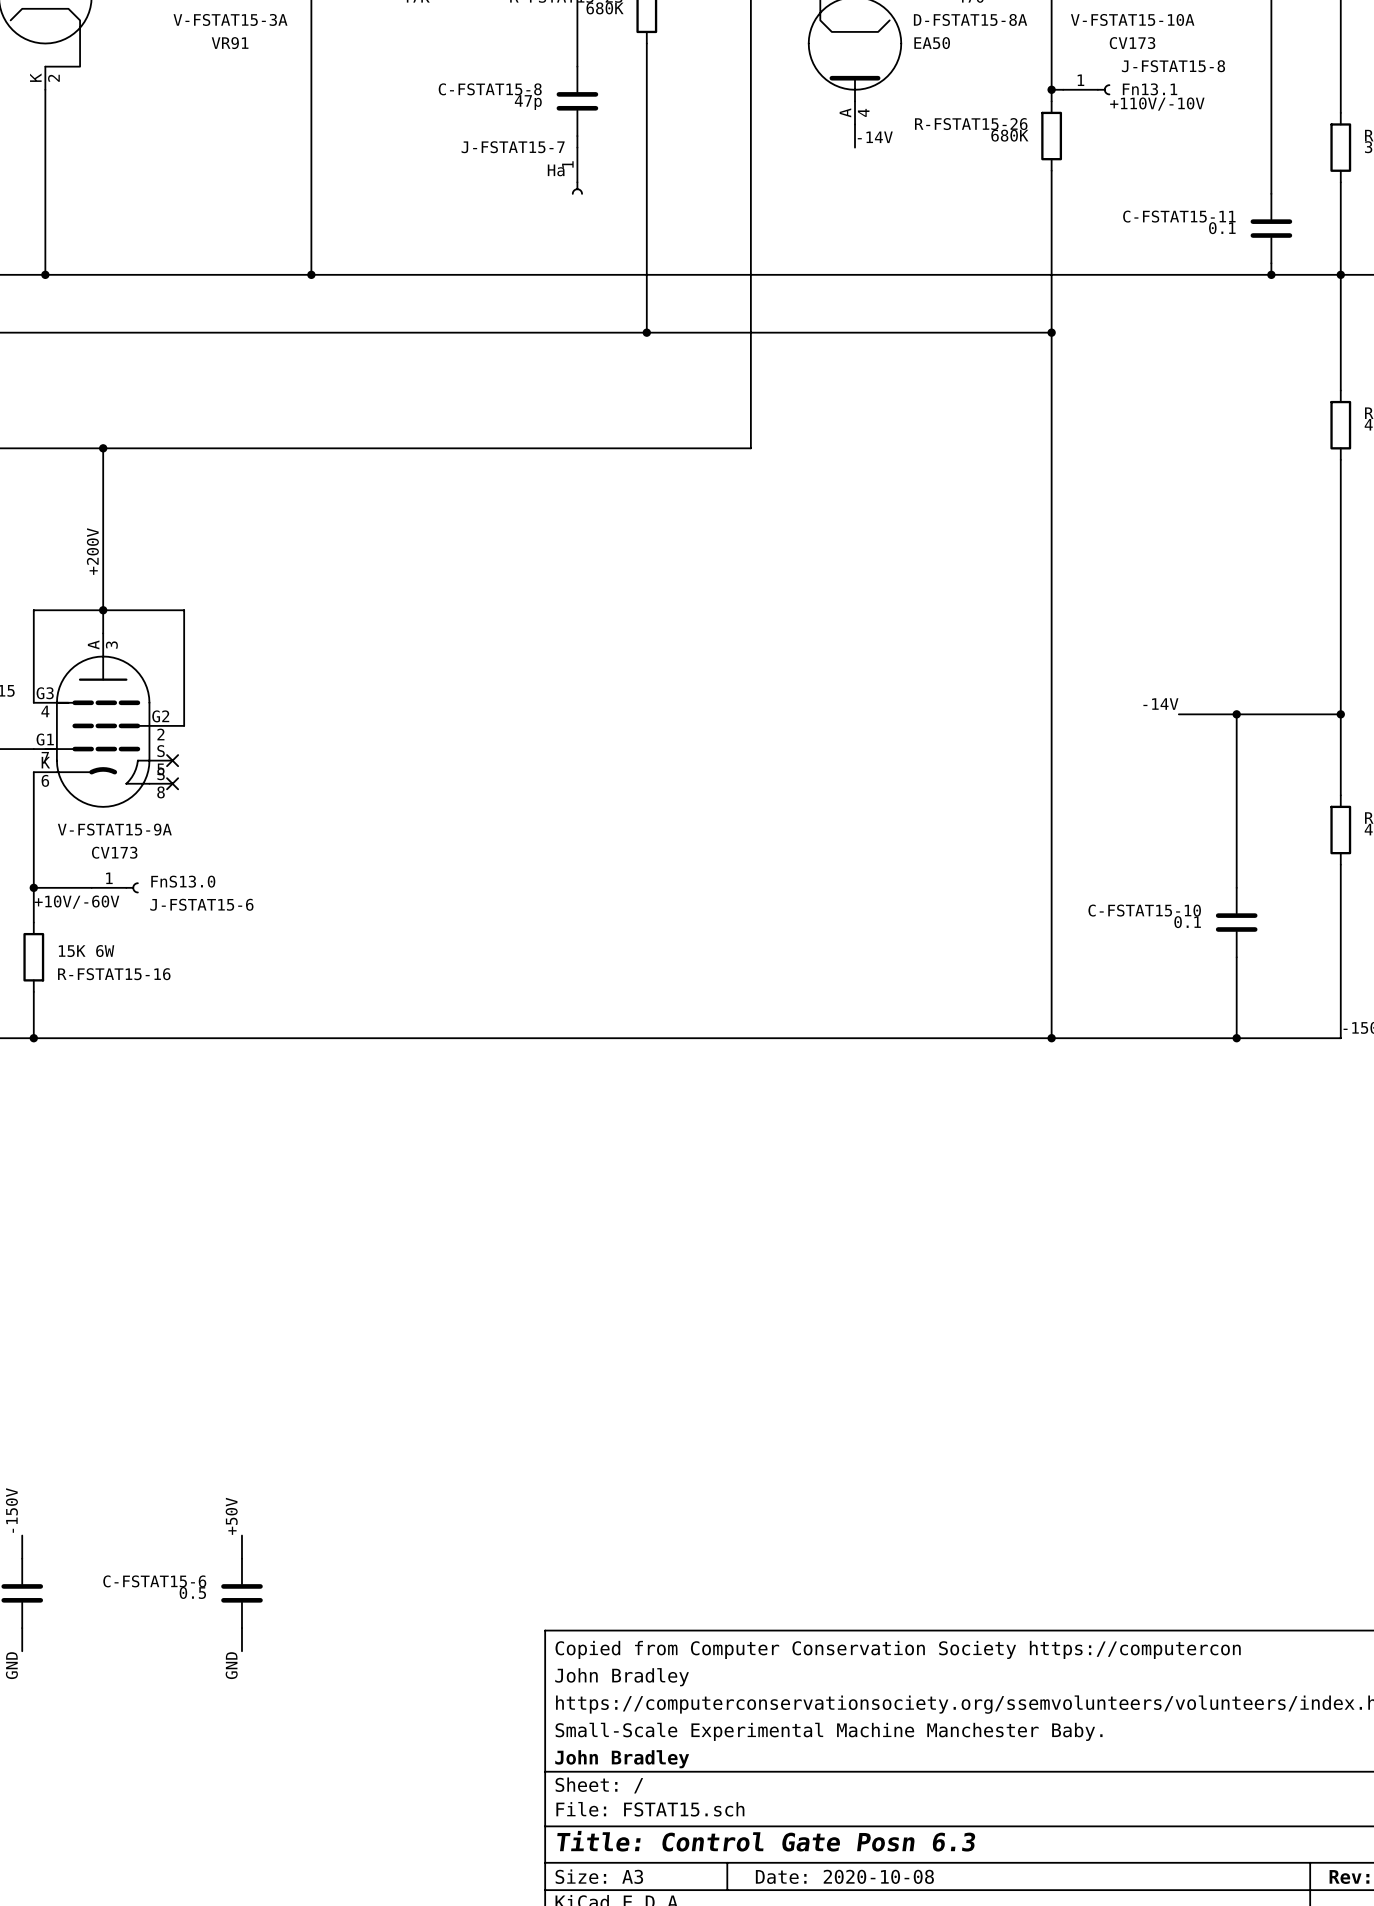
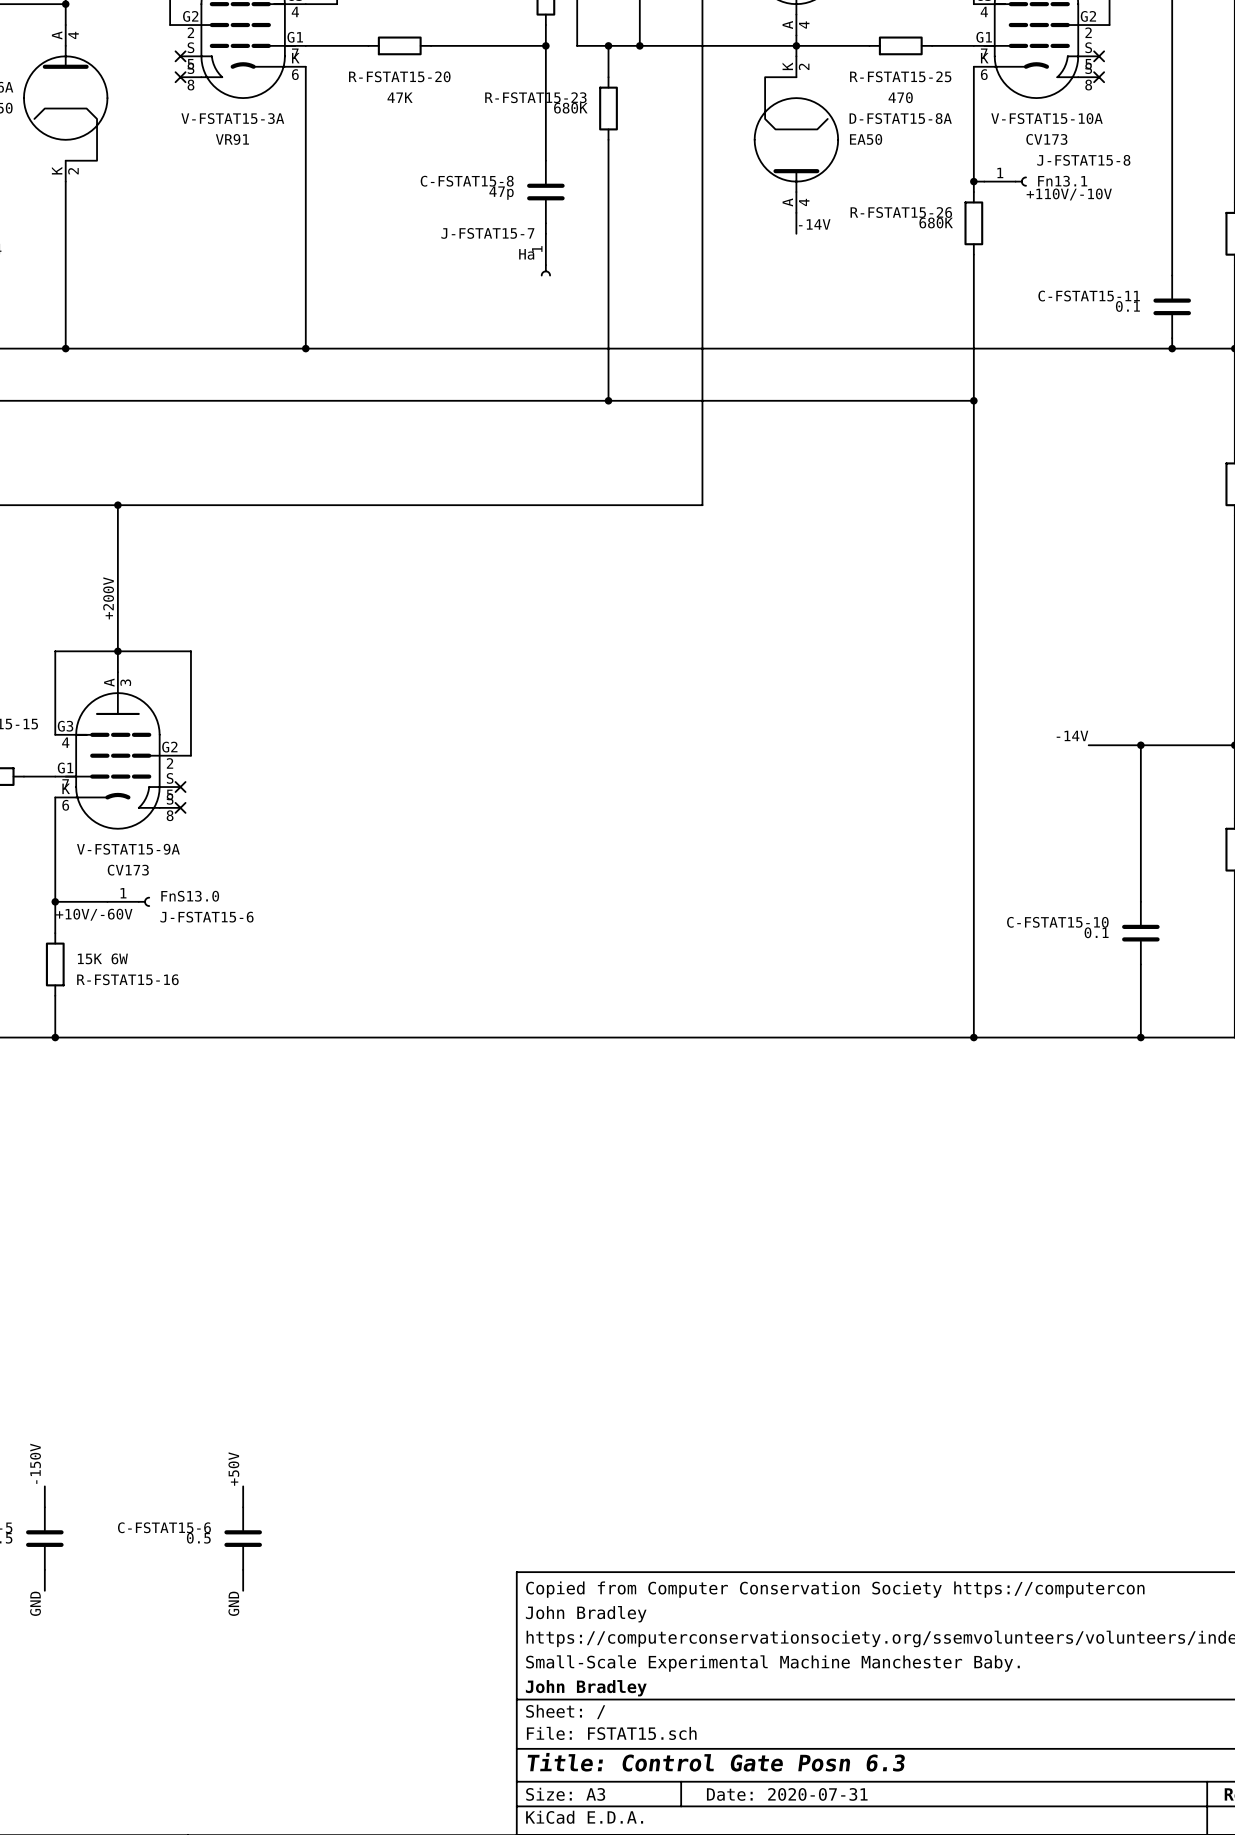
title block: Date: 2020-10-08 (844, 1876) -> Date: 2020-07-31 (787, 1794)

